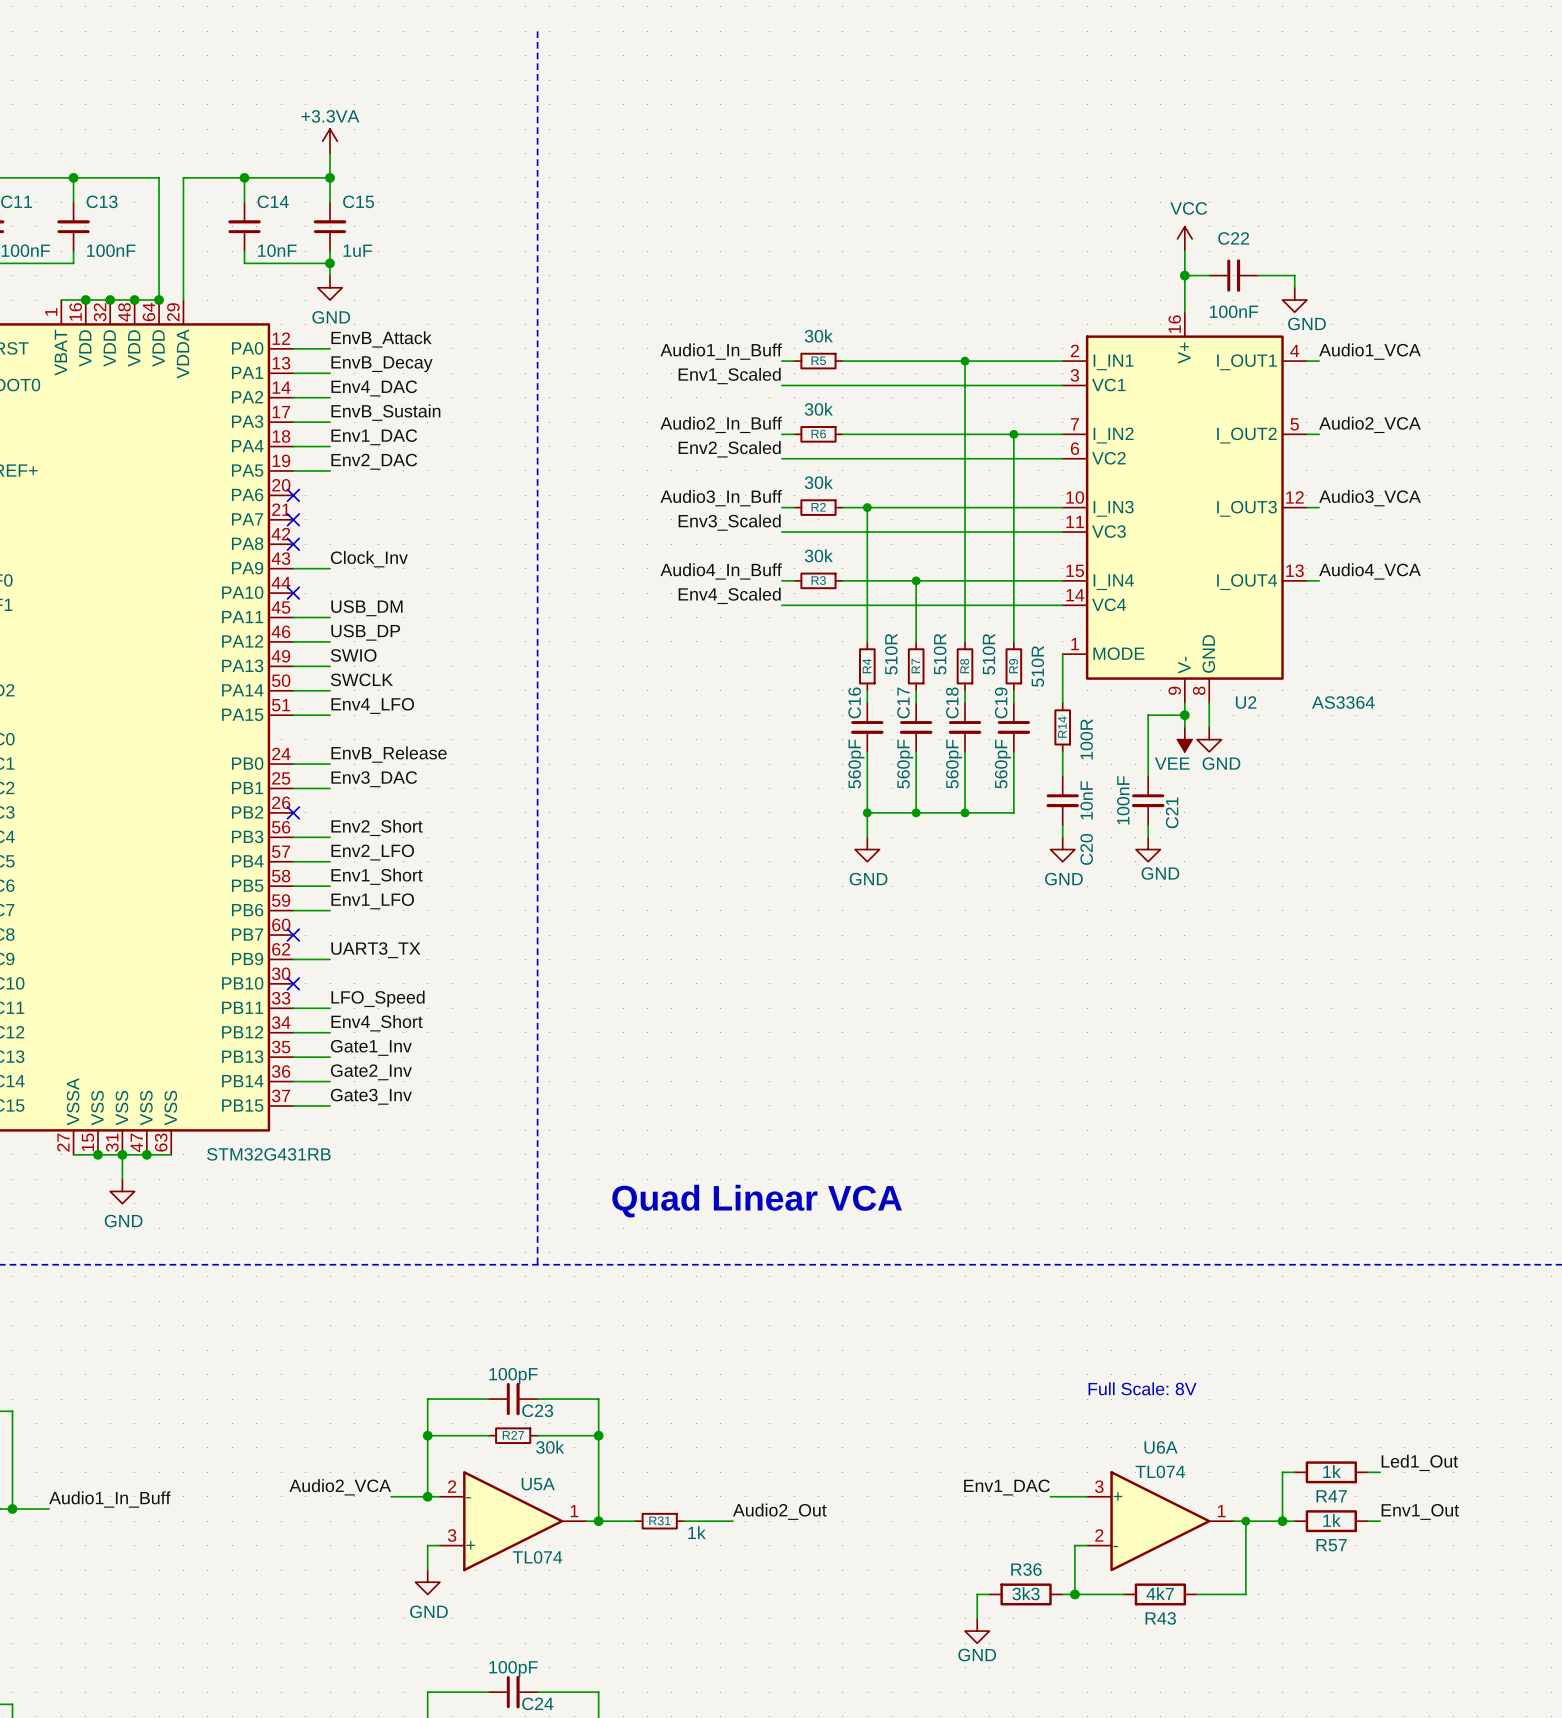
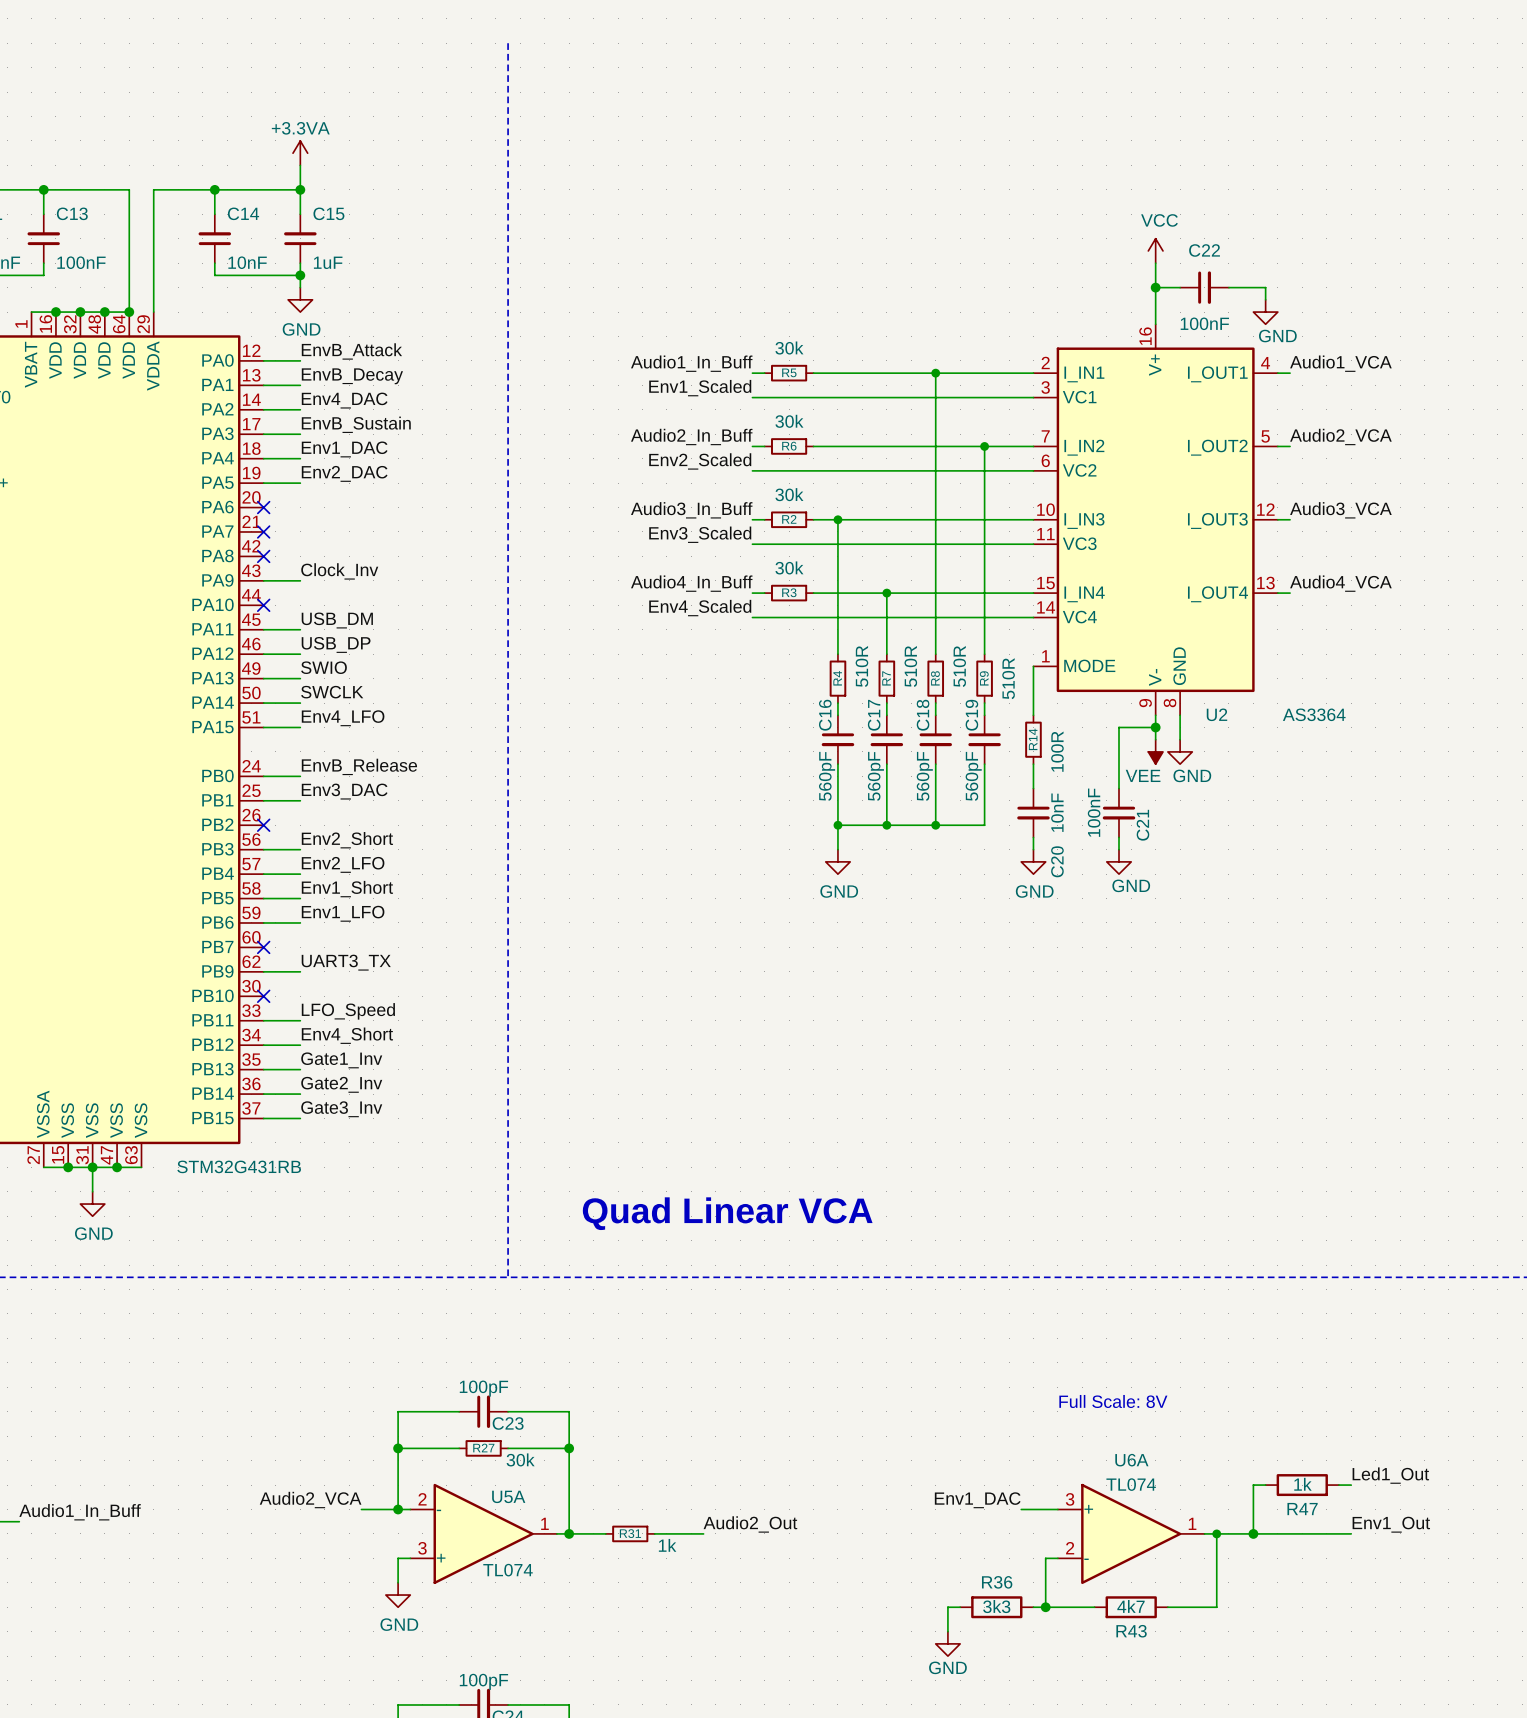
wire: none -> (1265, 1533) (1338, 1533)
R57: 1k (1331, 1521) -> none

